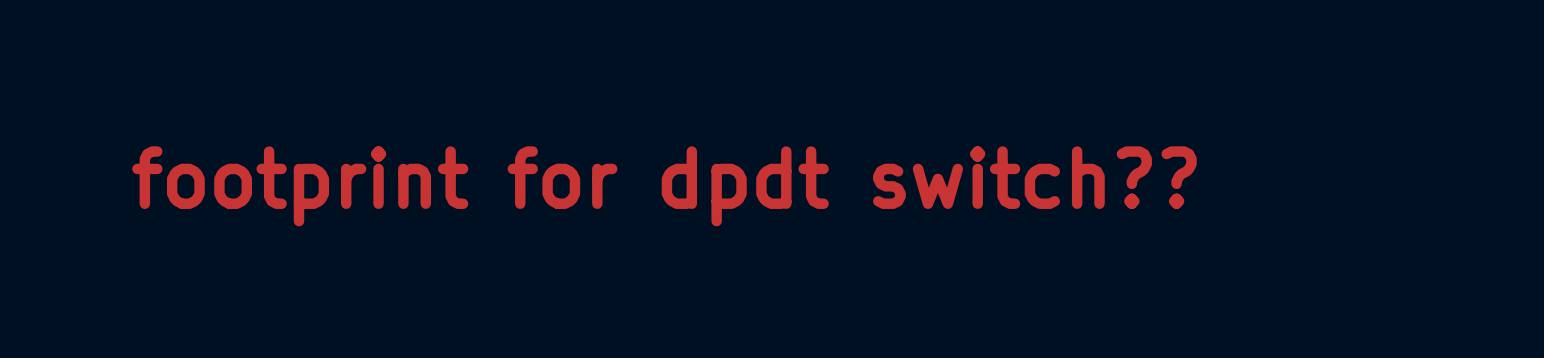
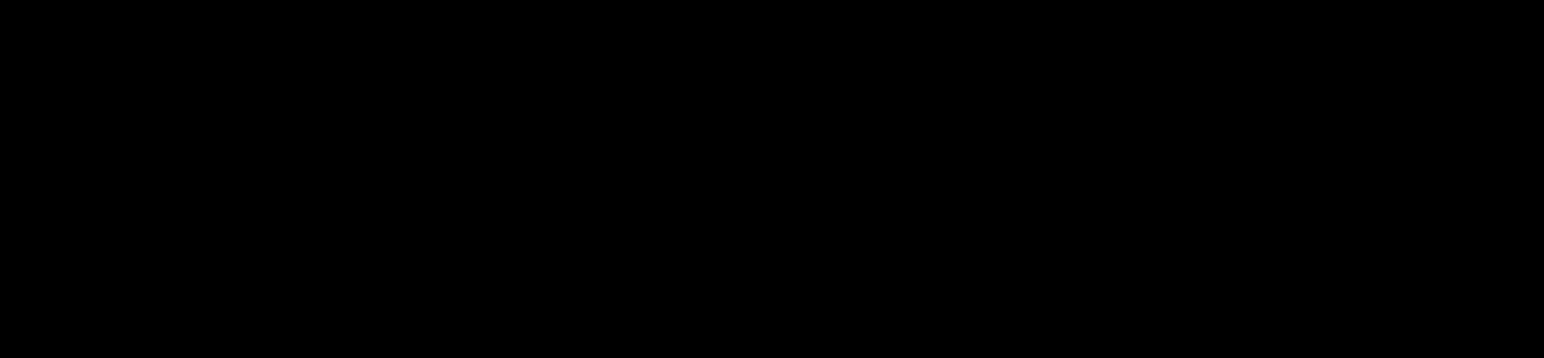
text: footprint for dpdt switch?? (664, 186) -> none

